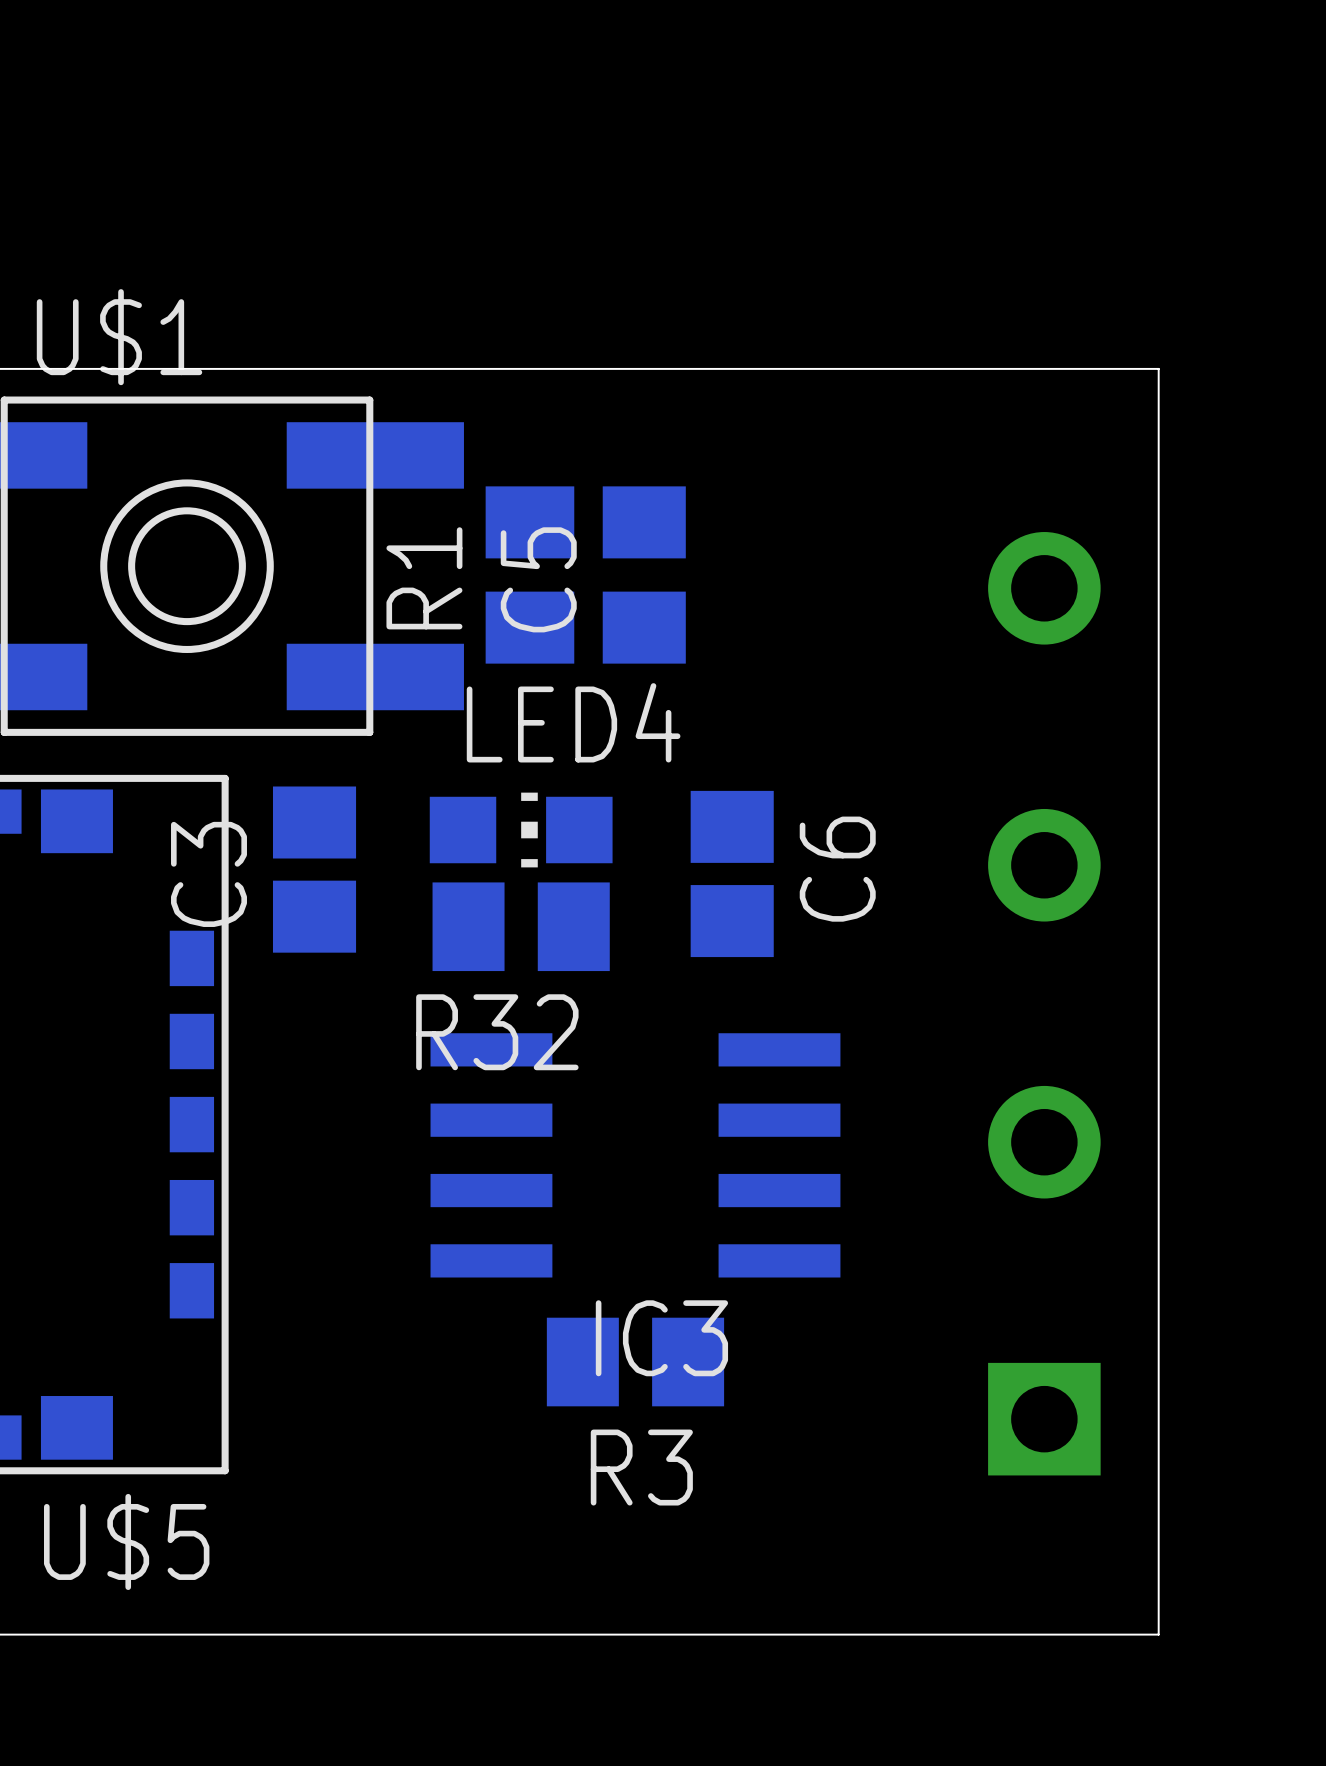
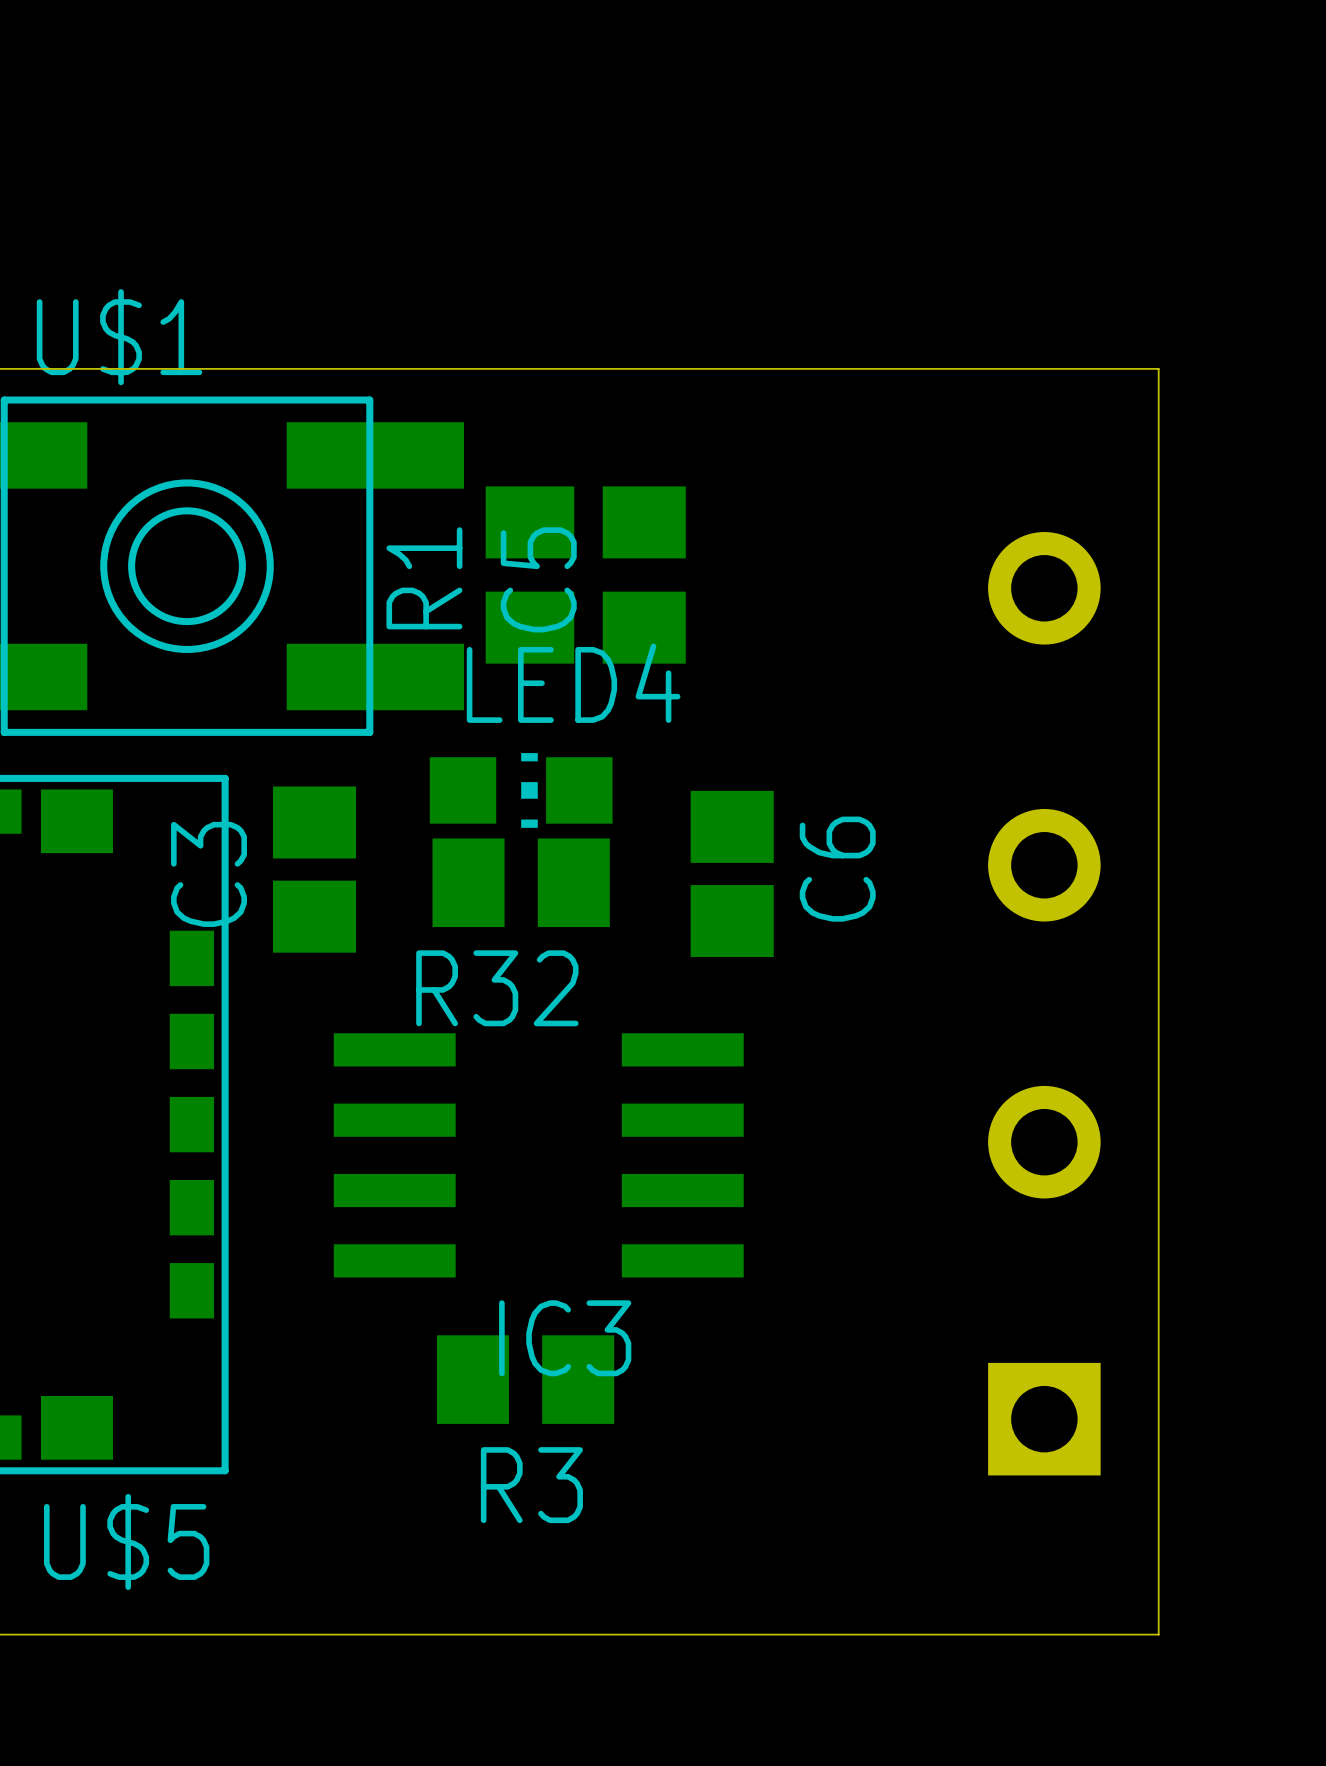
LED4 position: (521, 830) -> (521, 790)
R32 position: (521, 926) -> (521, 882)
IC3 position: (635, 1155) -> (538, 1155)
R3 position: (635, 1362) -> (525, 1379)

